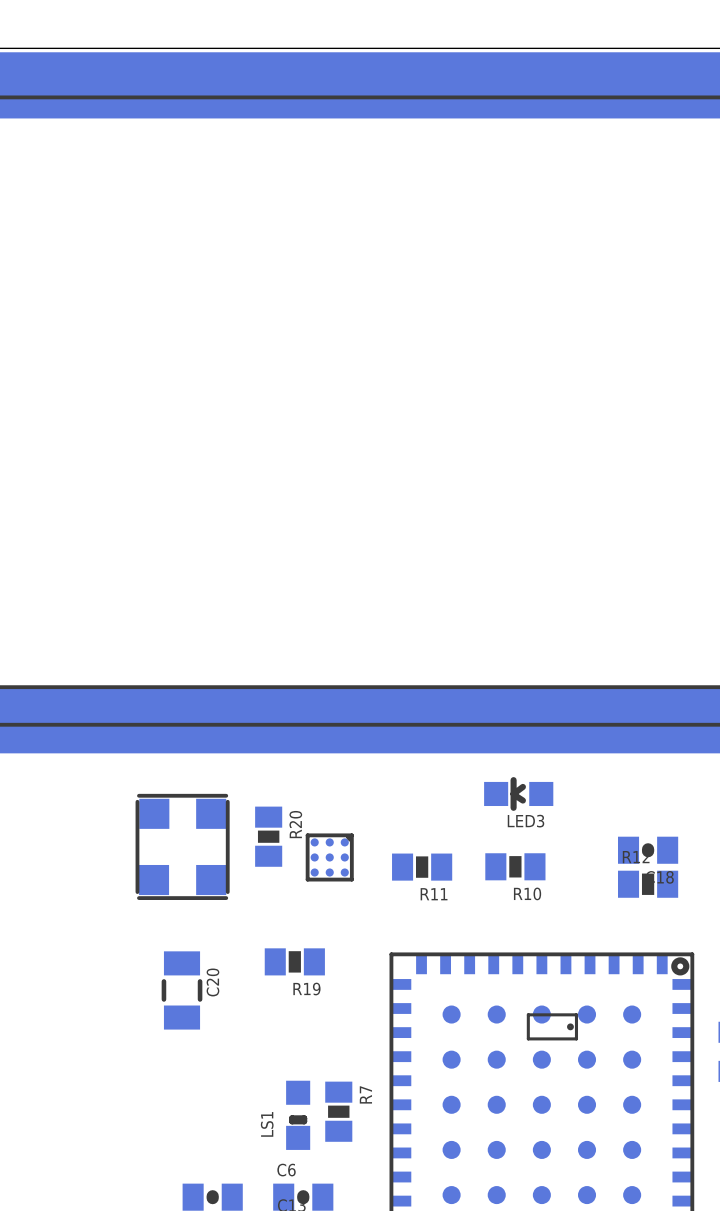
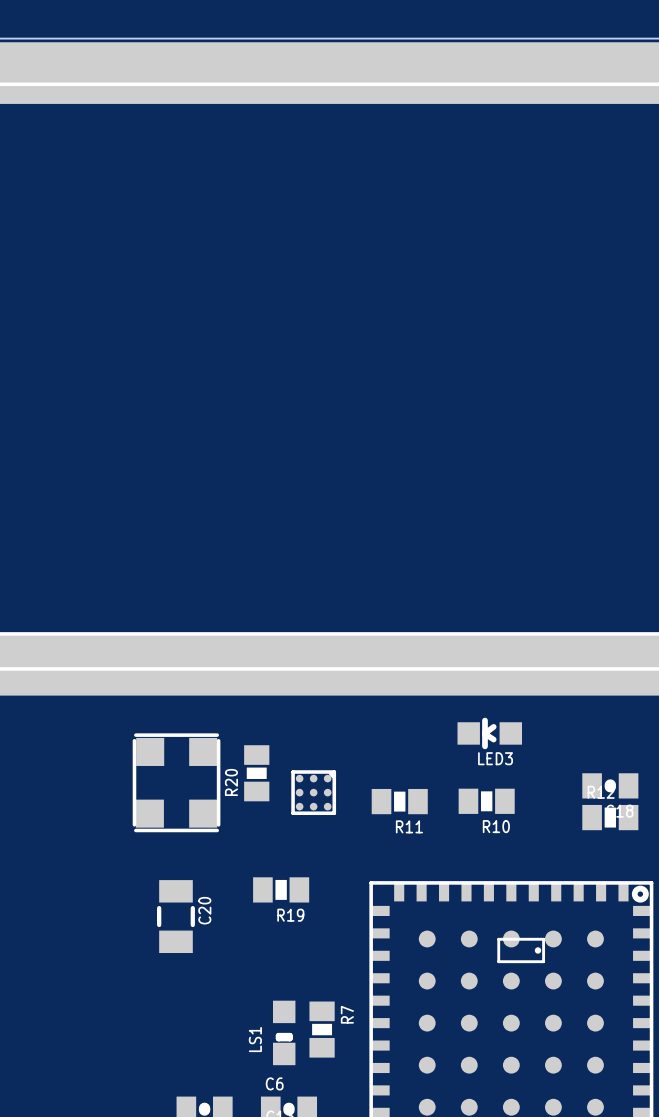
R20 name position: R20 (295, 824) -> R20 (231, 782)

